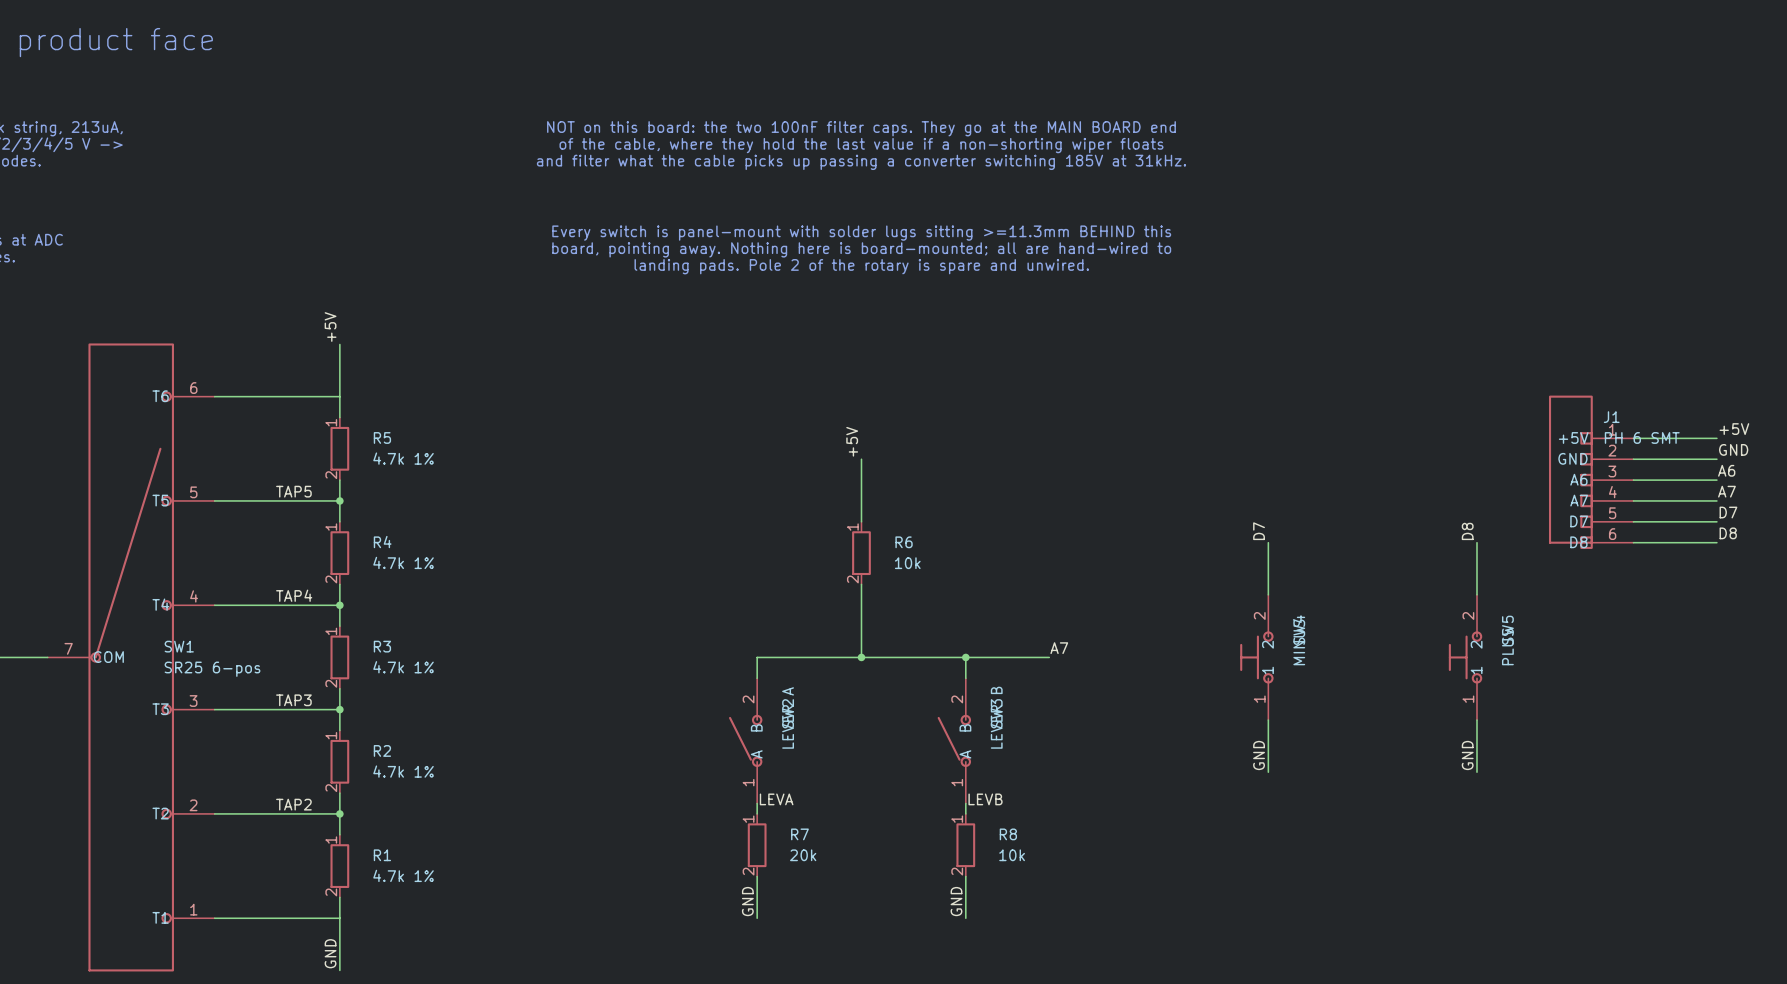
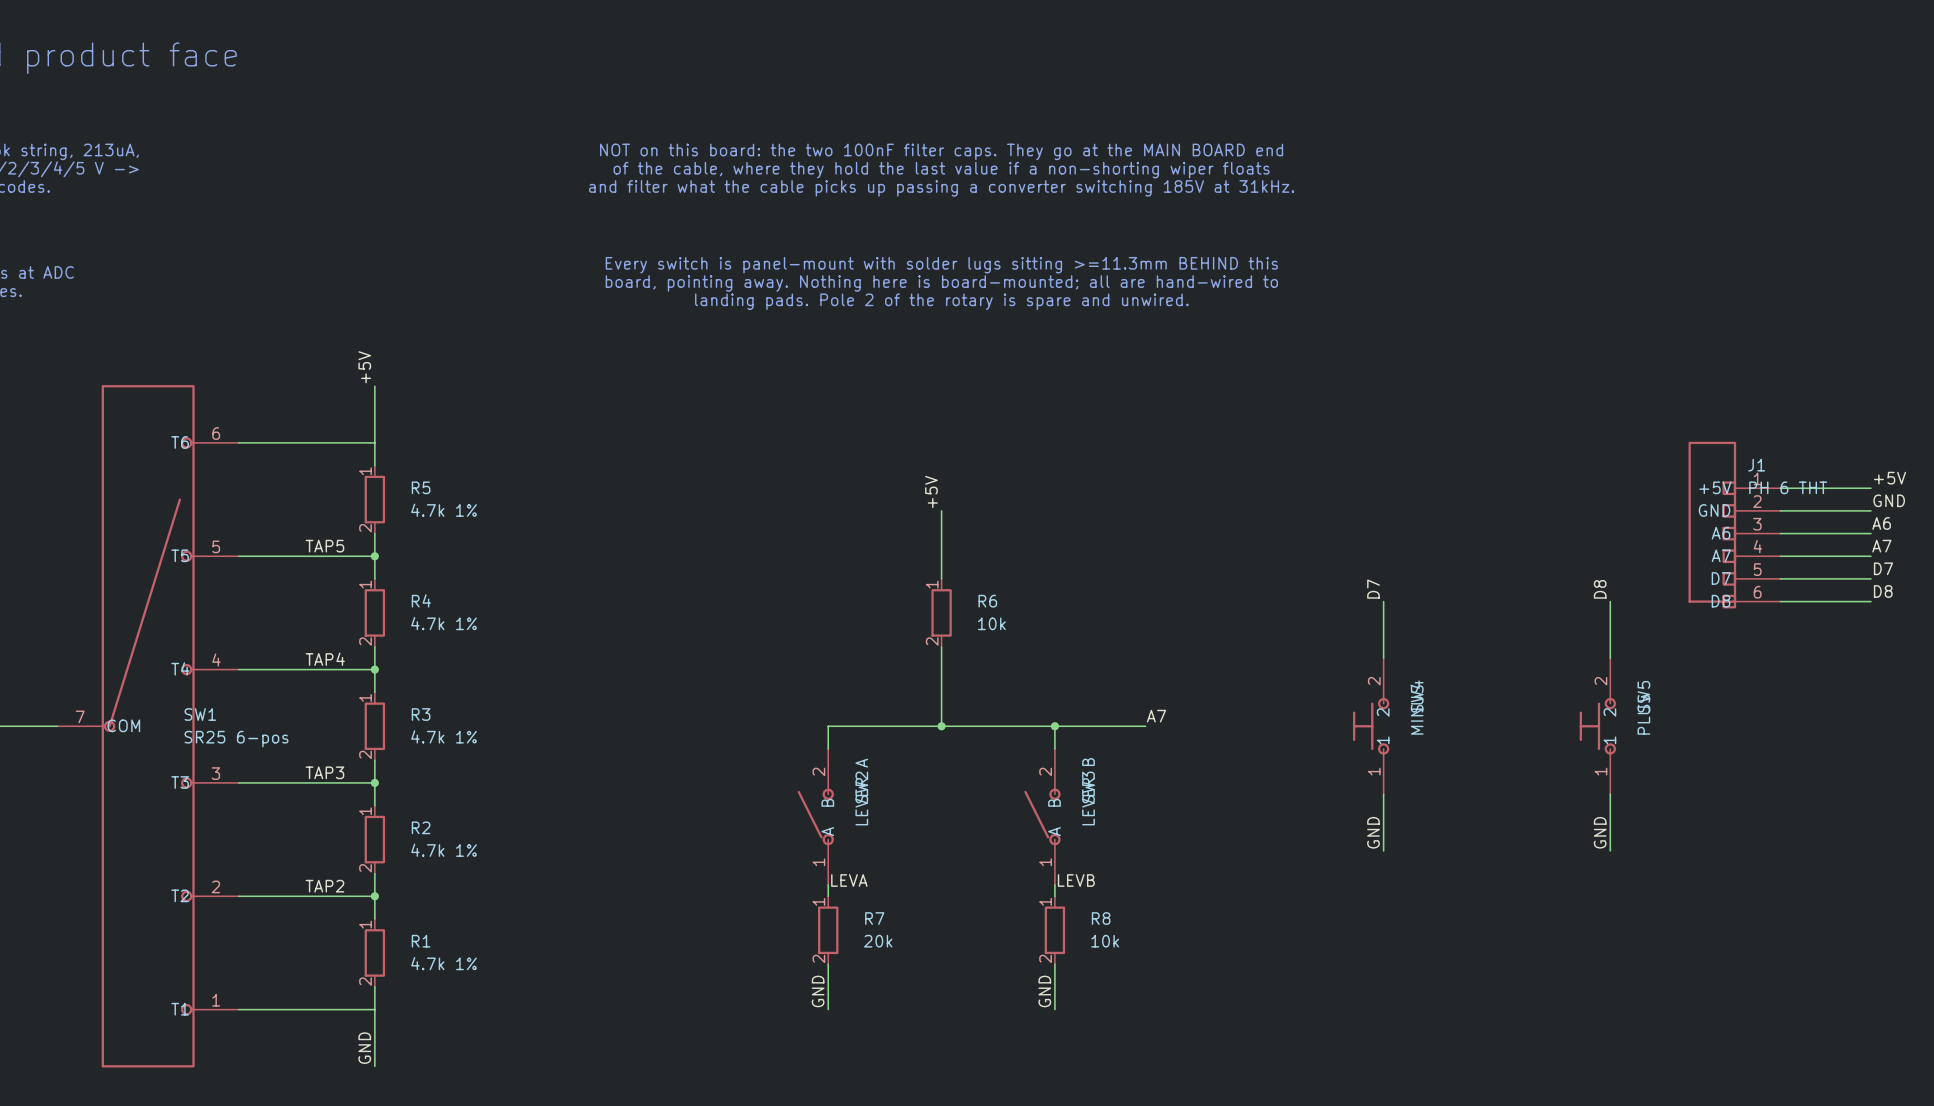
J1 value: PH 6 SMT (1642, 437) -> PH 6 THT (1788, 487)

